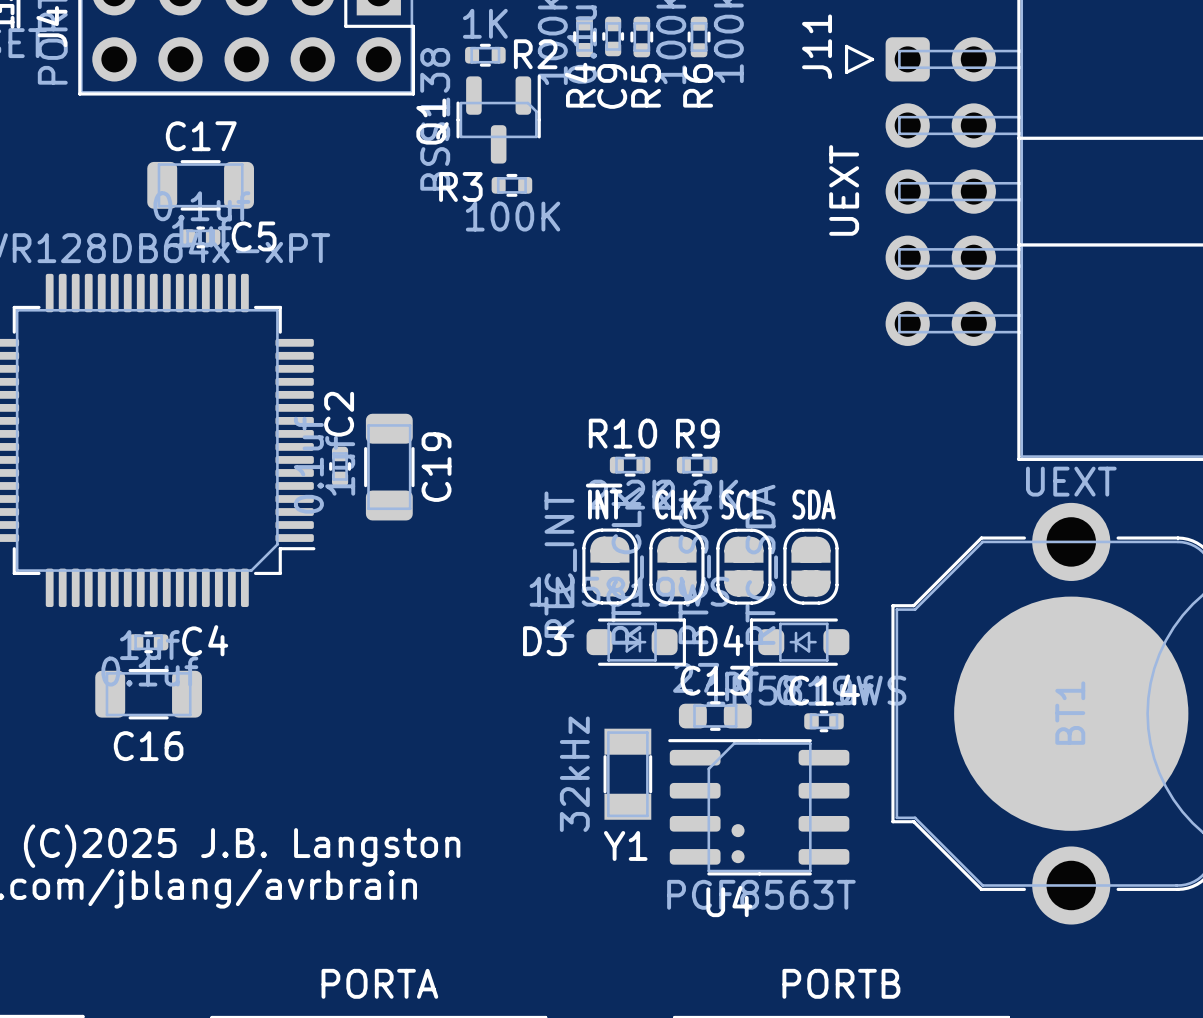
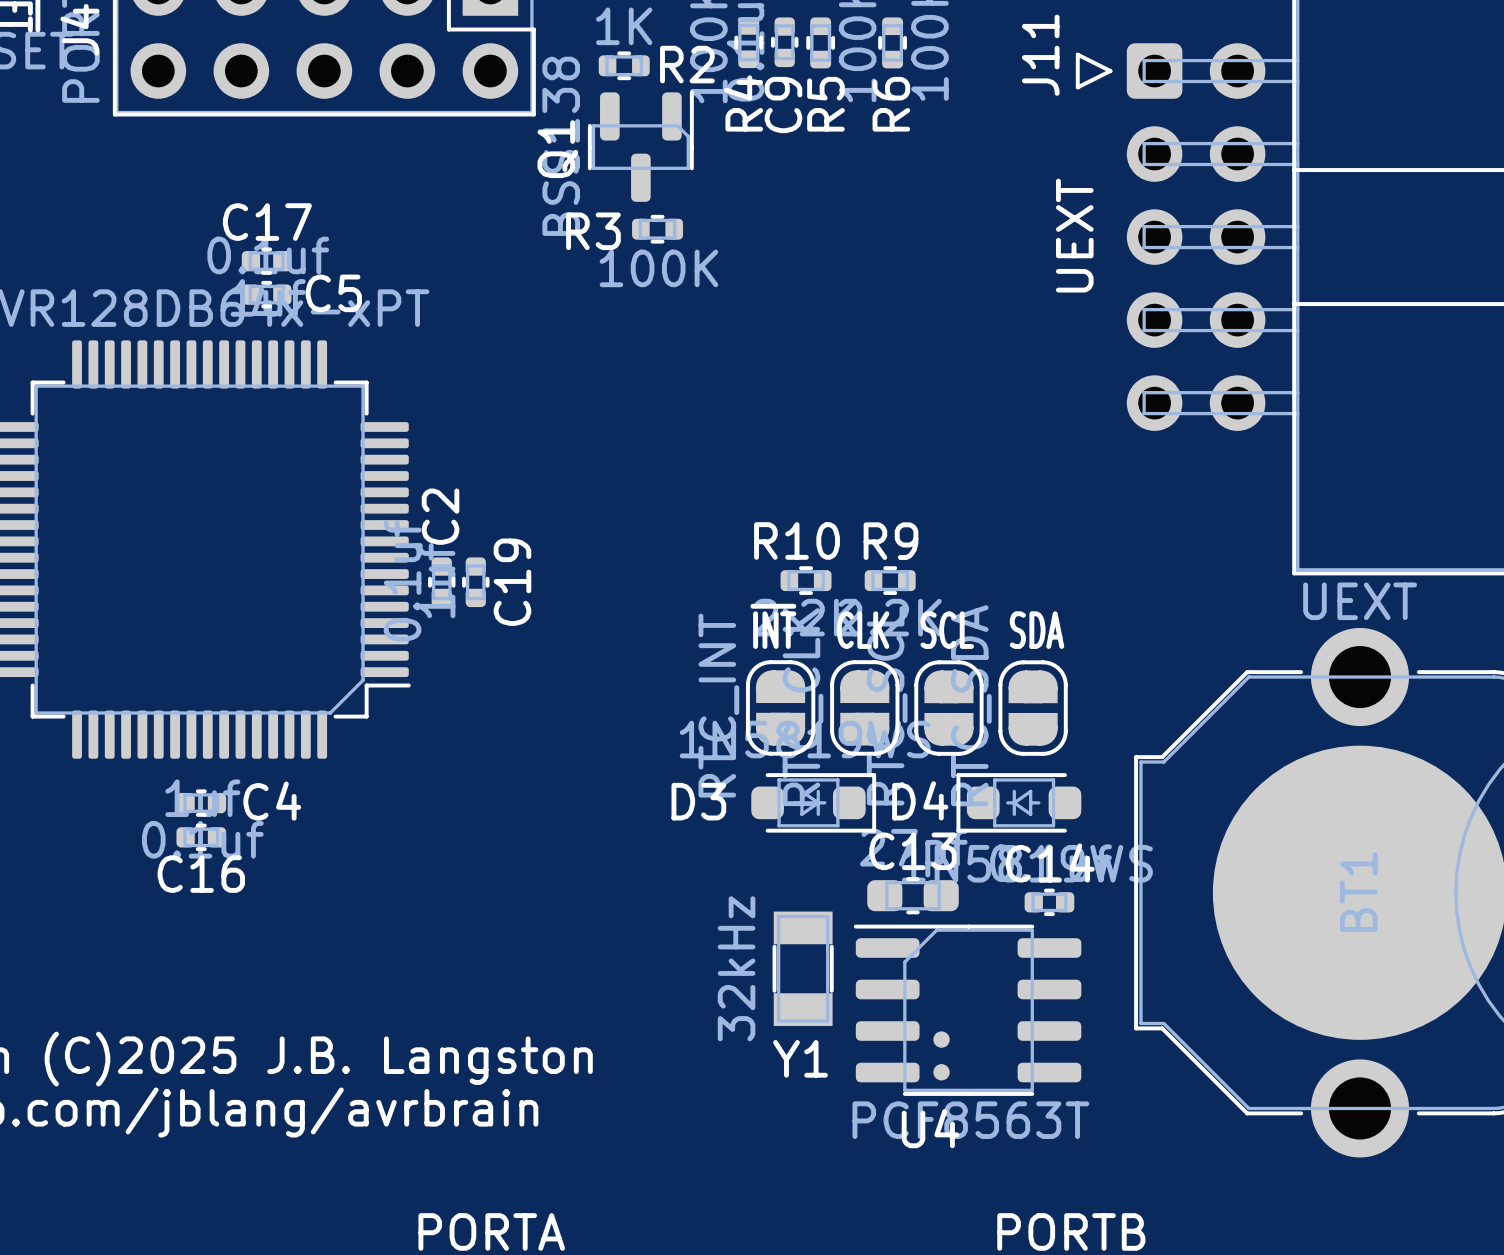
C17 footprint: [147, 160, 254, 211] -> [241, 247, 292, 275]
C19 footprint: [364, 413, 415, 521] -> [462, 557, 490, 608]
C16 footprint: [95, 668, 202, 720] -> [176, 823, 227, 852]

